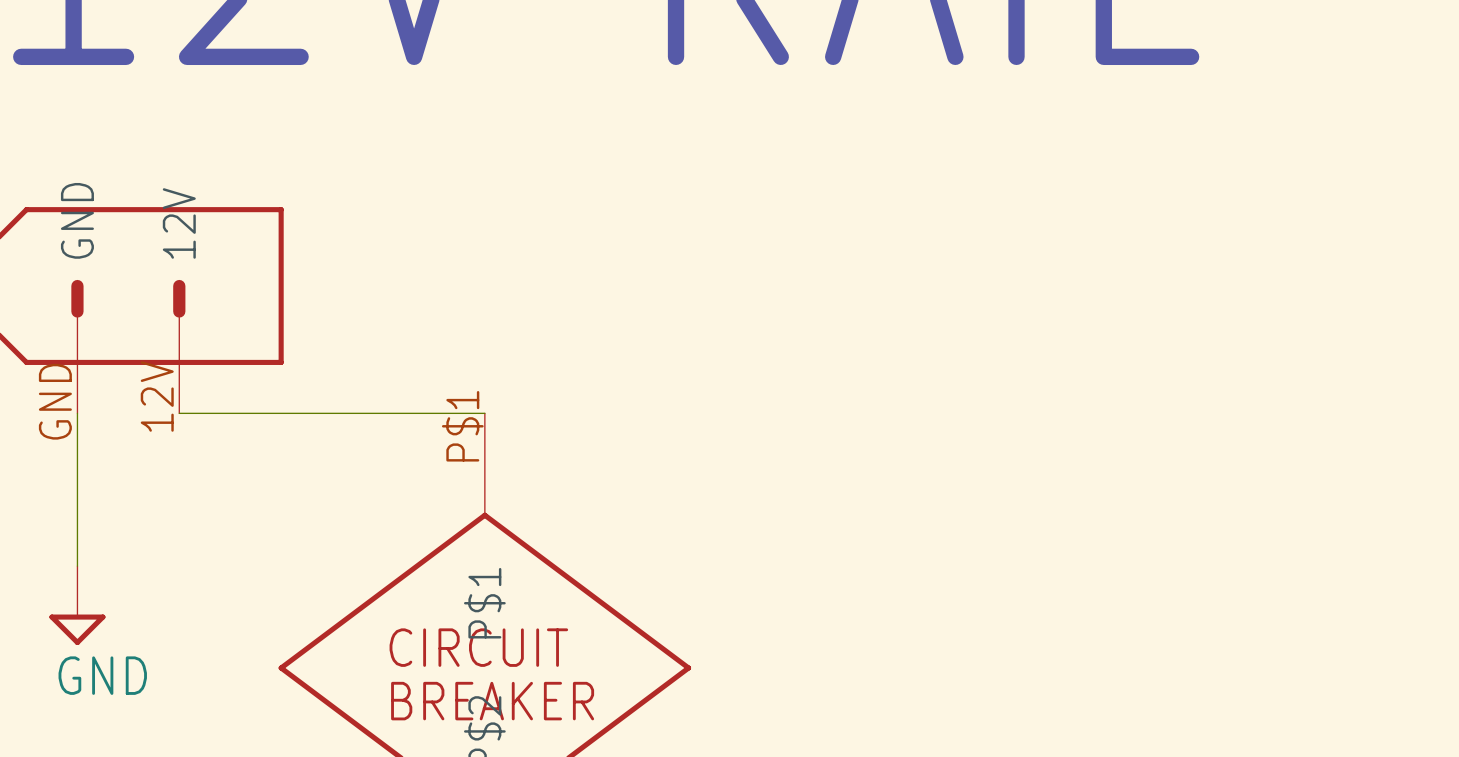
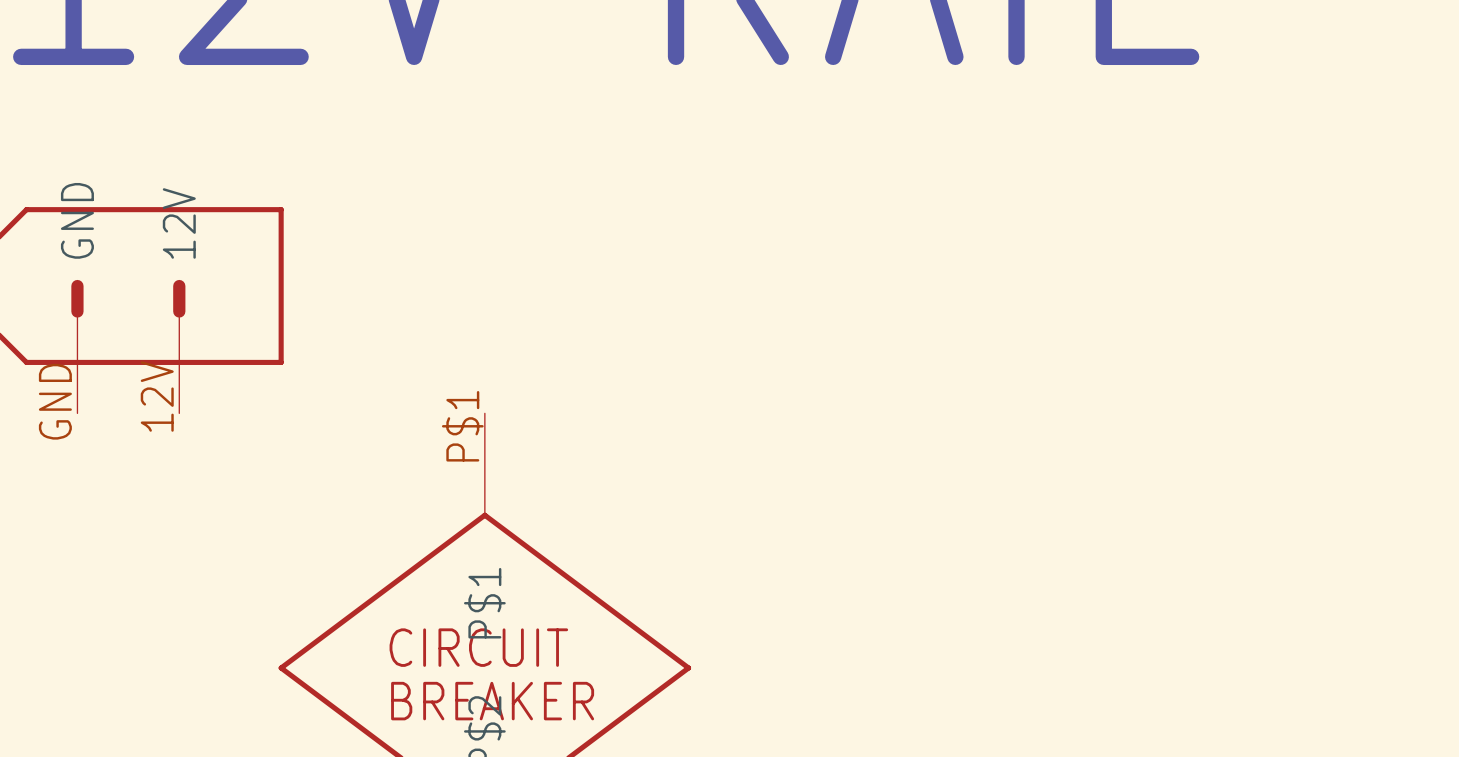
wire: (77, 413) (77, 566) -> none
wire: (179, 413) (484, 413) -> none
power symbol: GND (77, 605) -> none

